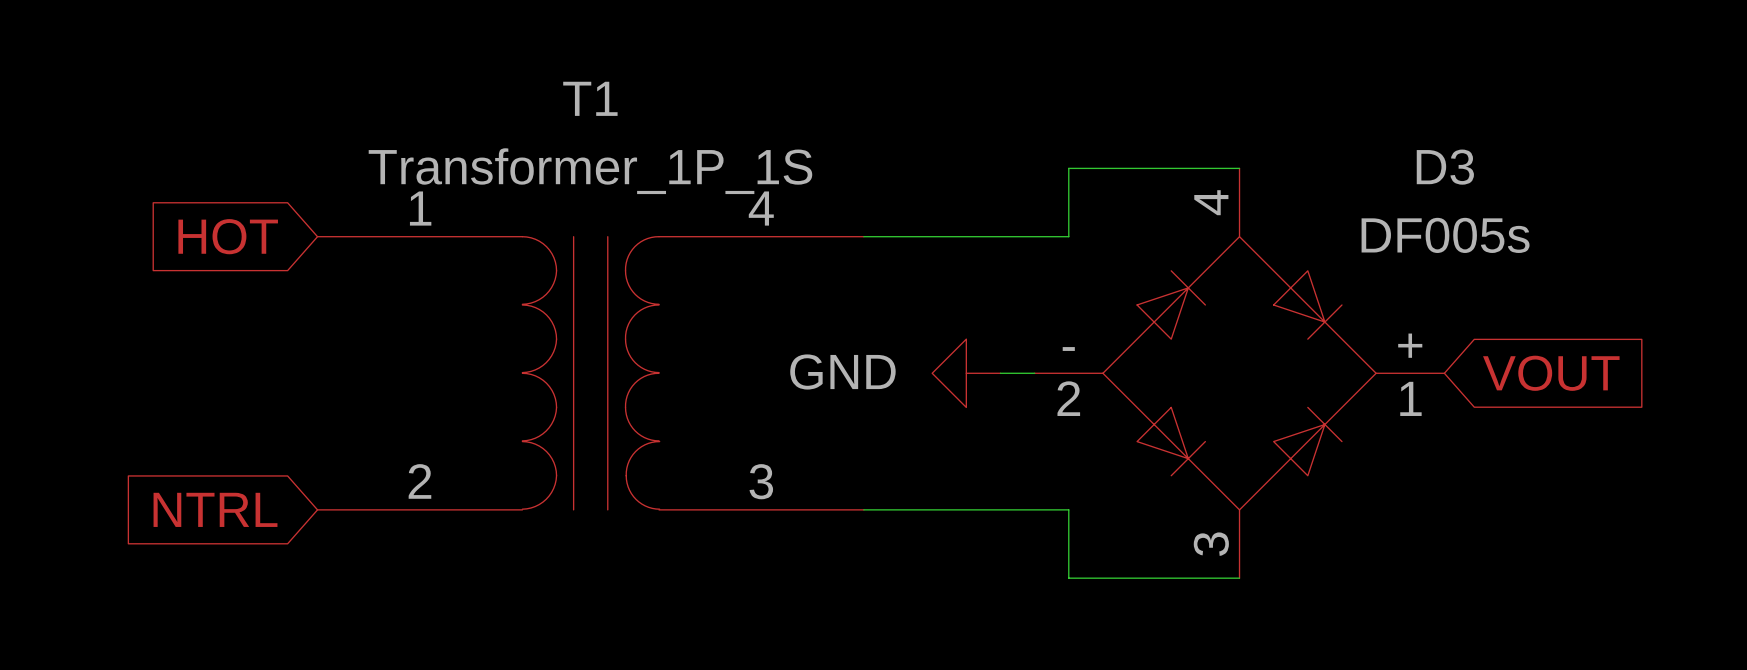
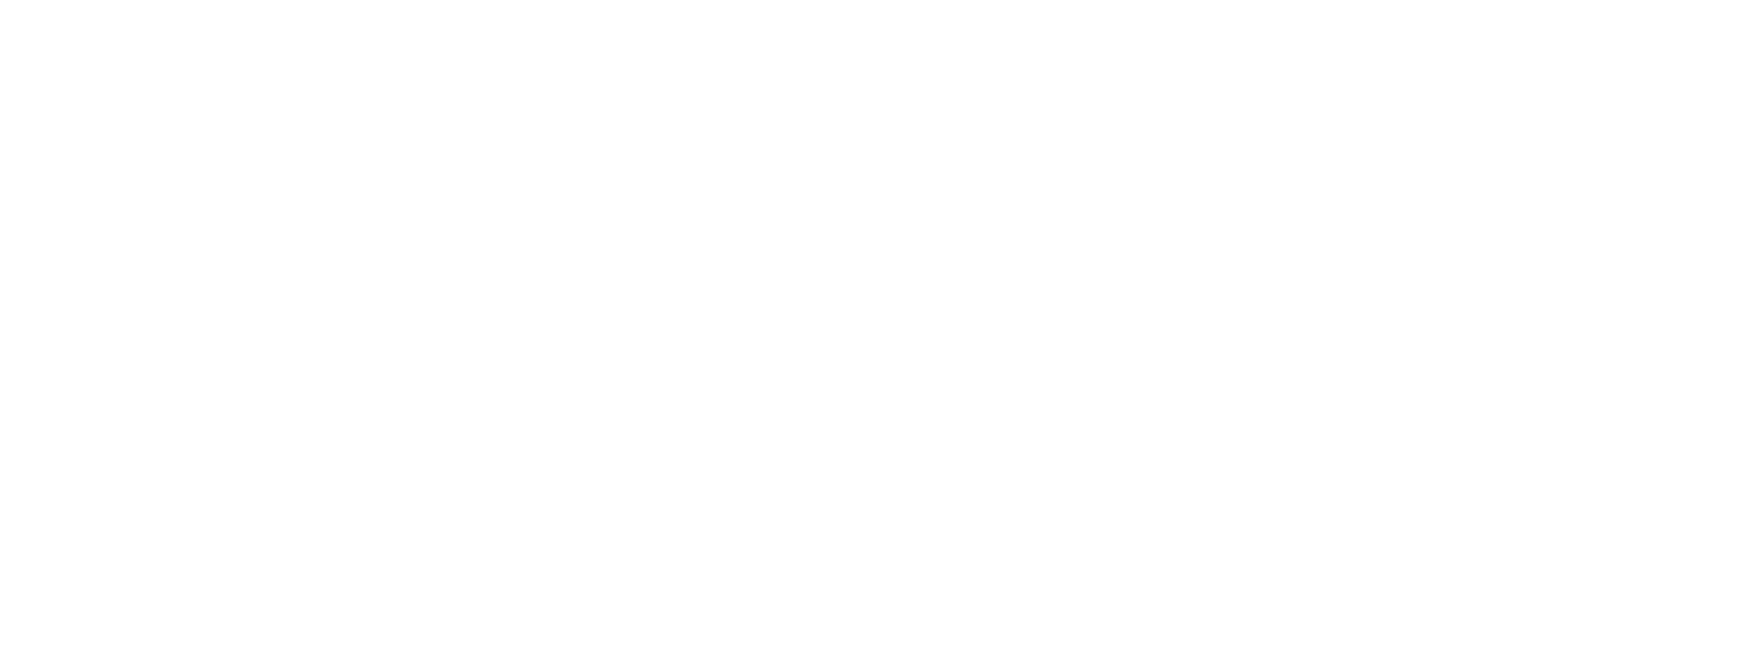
wire: (1239, 168) (1068, 168) (1068, 236) (863, 236) -> none
global label: HOT (228, 236) -> none
T1: Transformer_1P_1S (590, 373) -> none
power symbol: GND (966, 373) -> none
wire: (1000, 373) (1034, 373) -> none
D3: DF005s (1239, 373) -> none
global label: VOUT (1551, 373) -> none
global label: NTRL (215, 509) -> none
wire: (863, 509) (1068, 509) (1068, 578) (1239, 578) -> none

